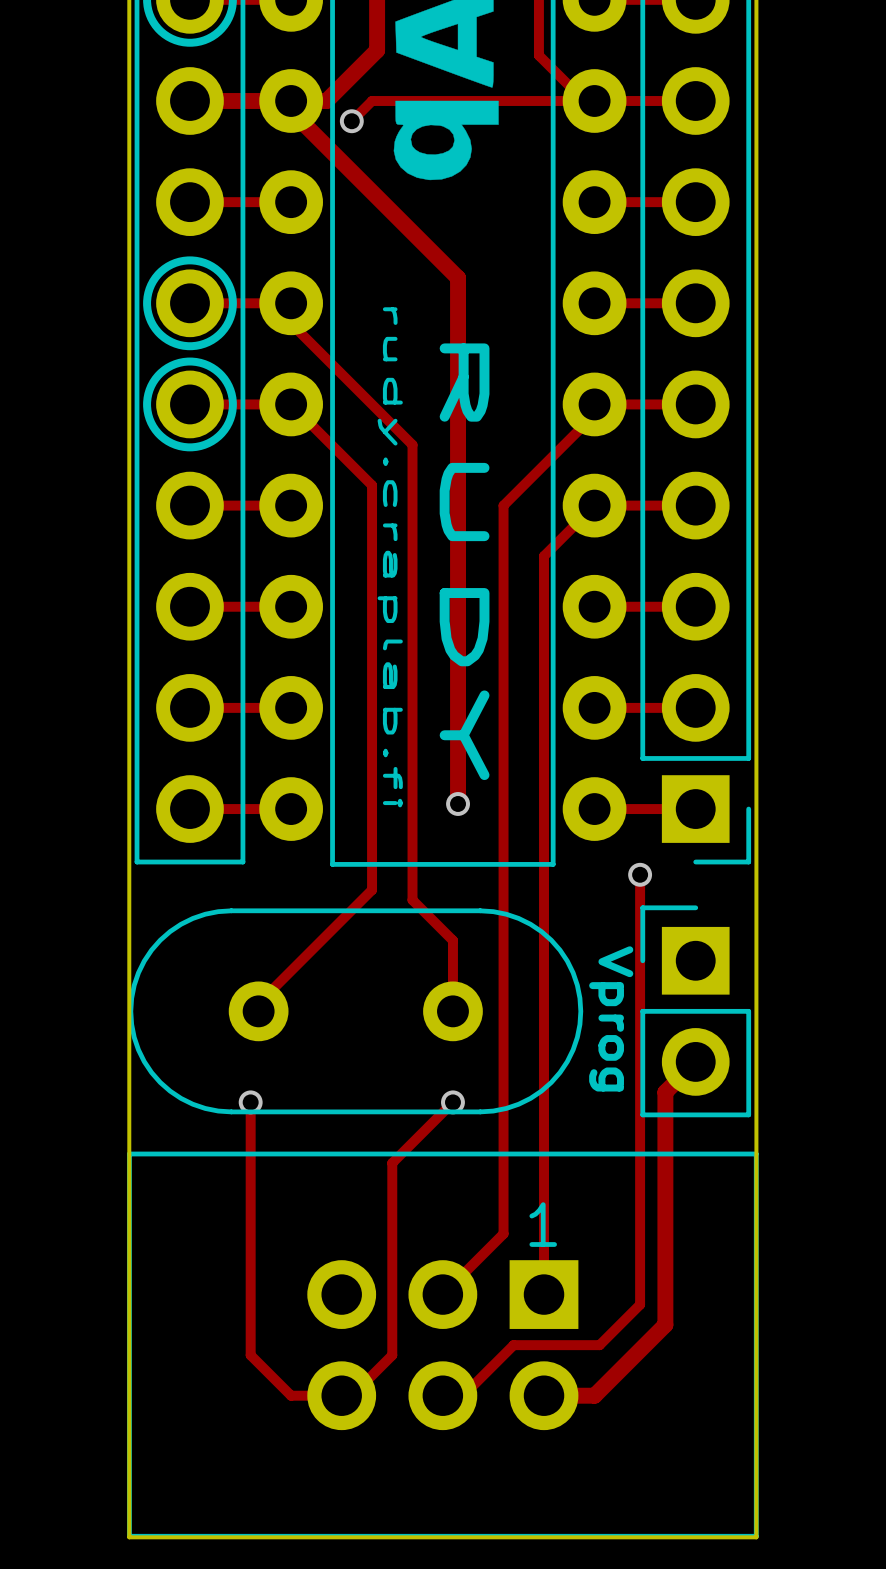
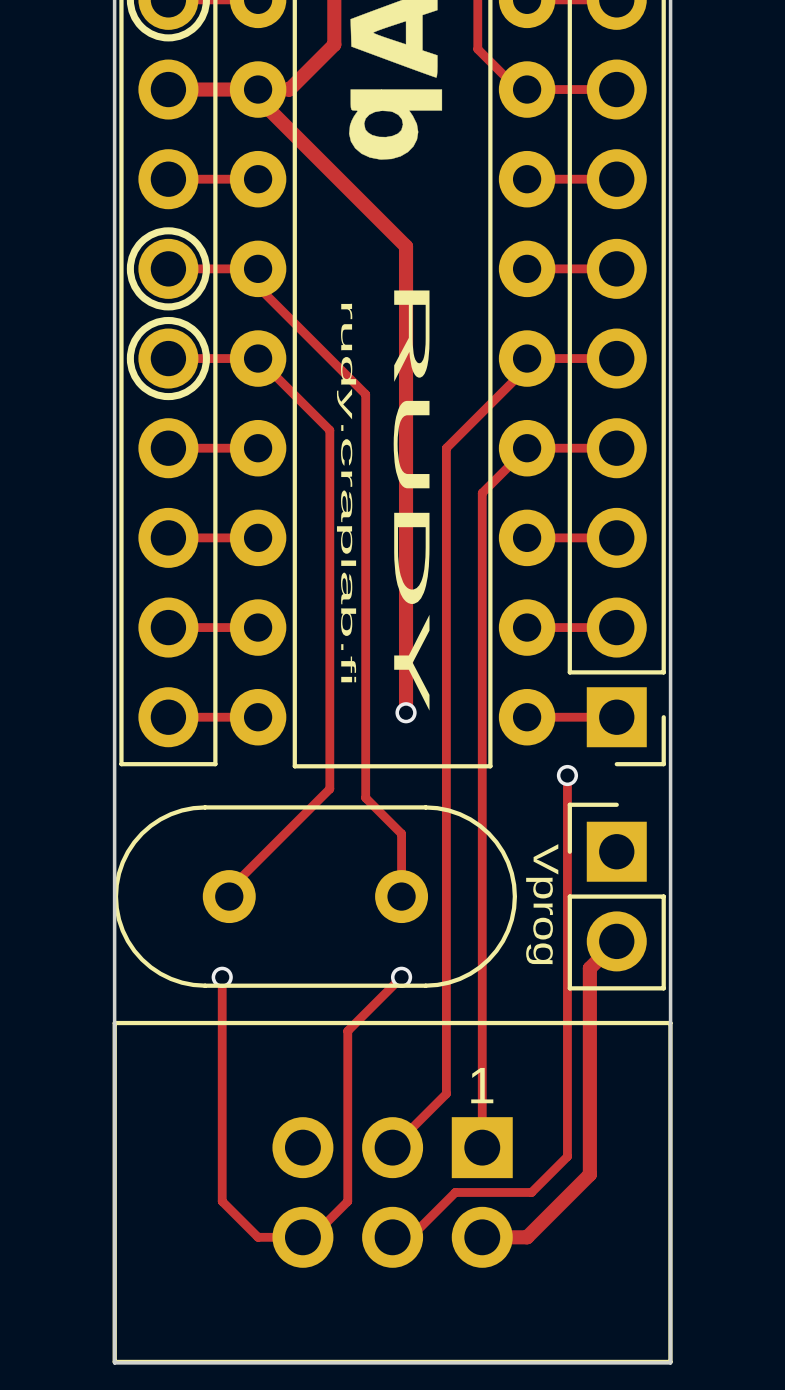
track: (579, 100) (372, 100) (351, 121) -> none
via: (351, 121) -> none

